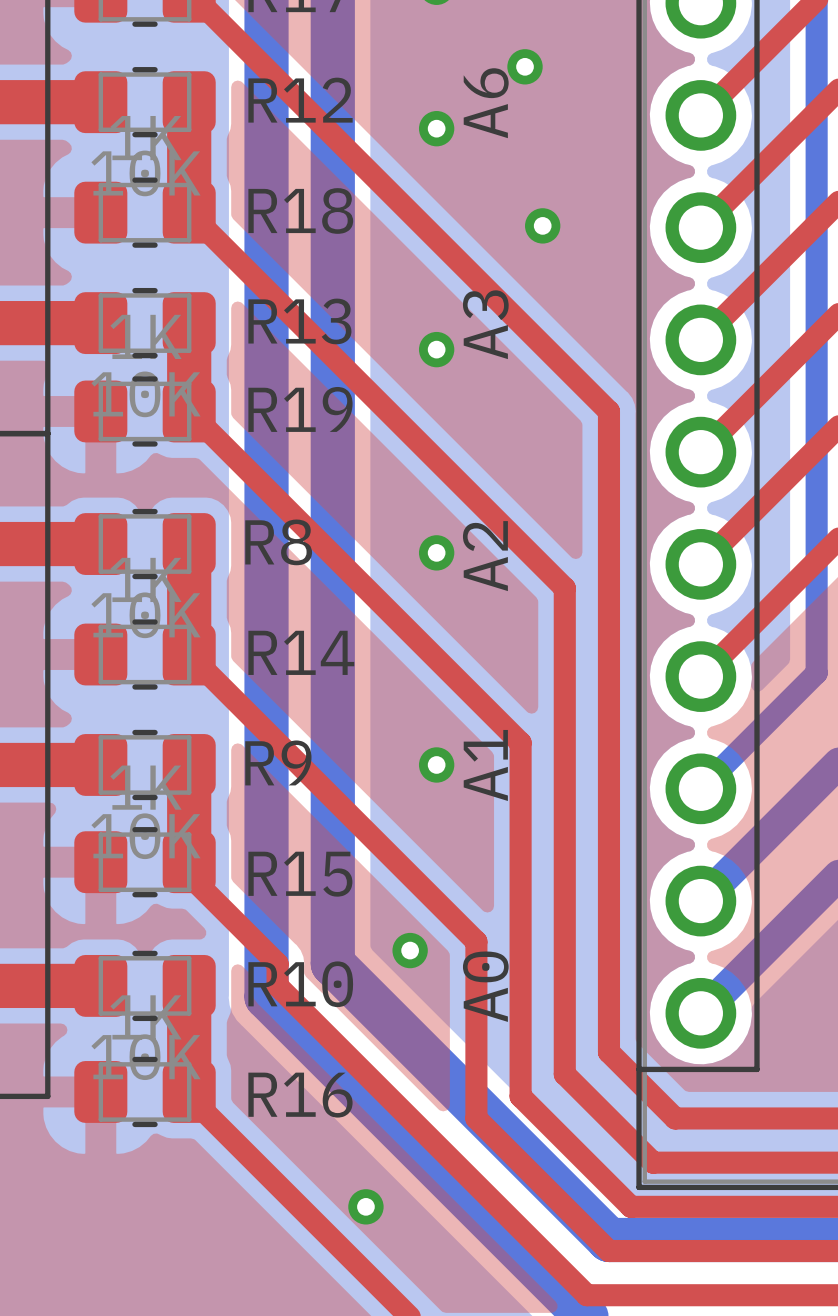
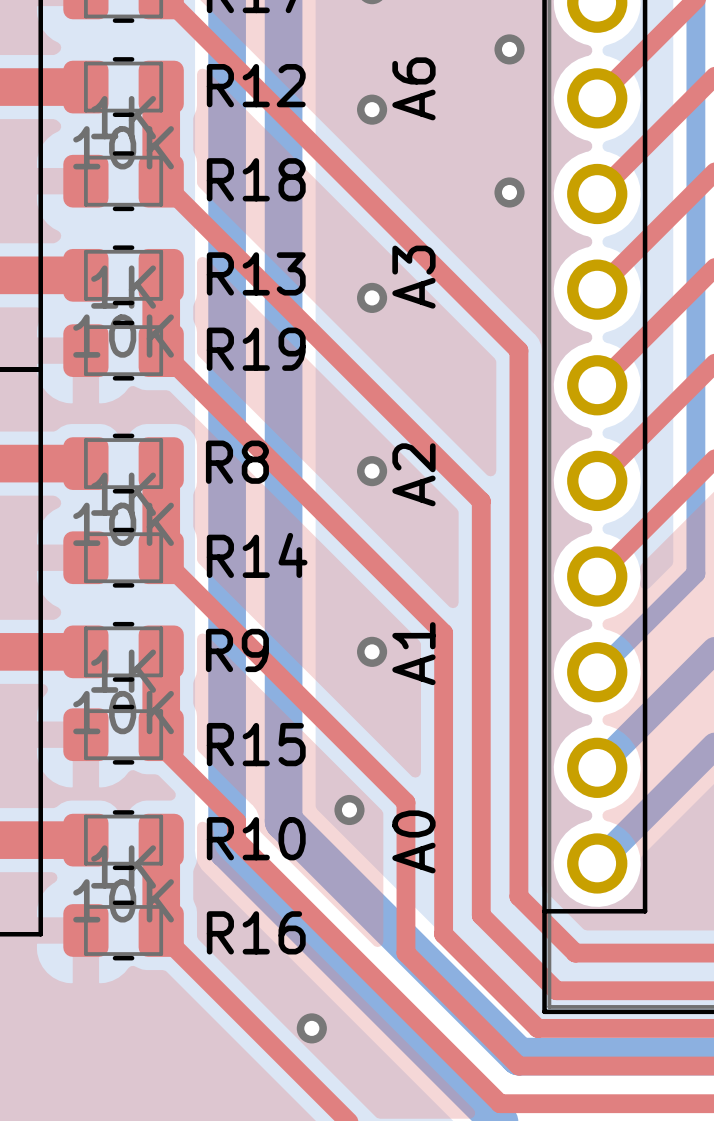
via position: (525, 66) -> (509, 49)
via position: (542, 225) -> (509, 192)

